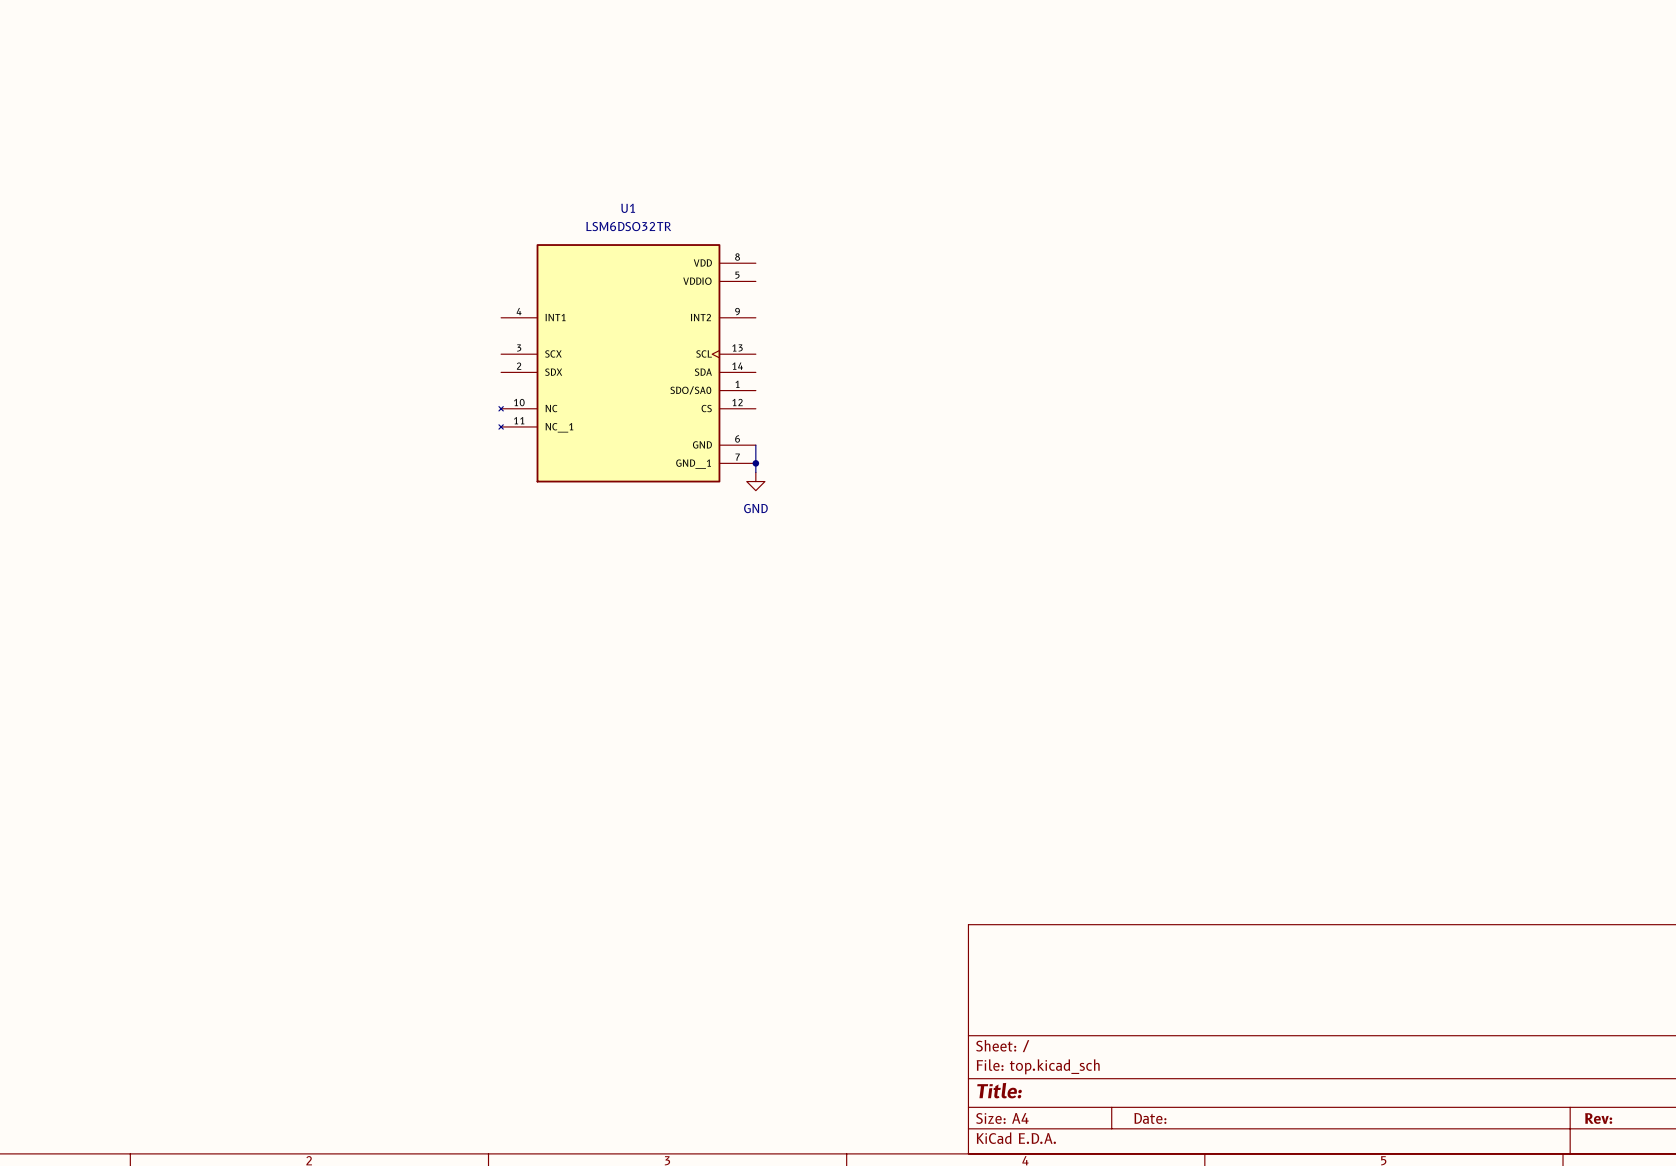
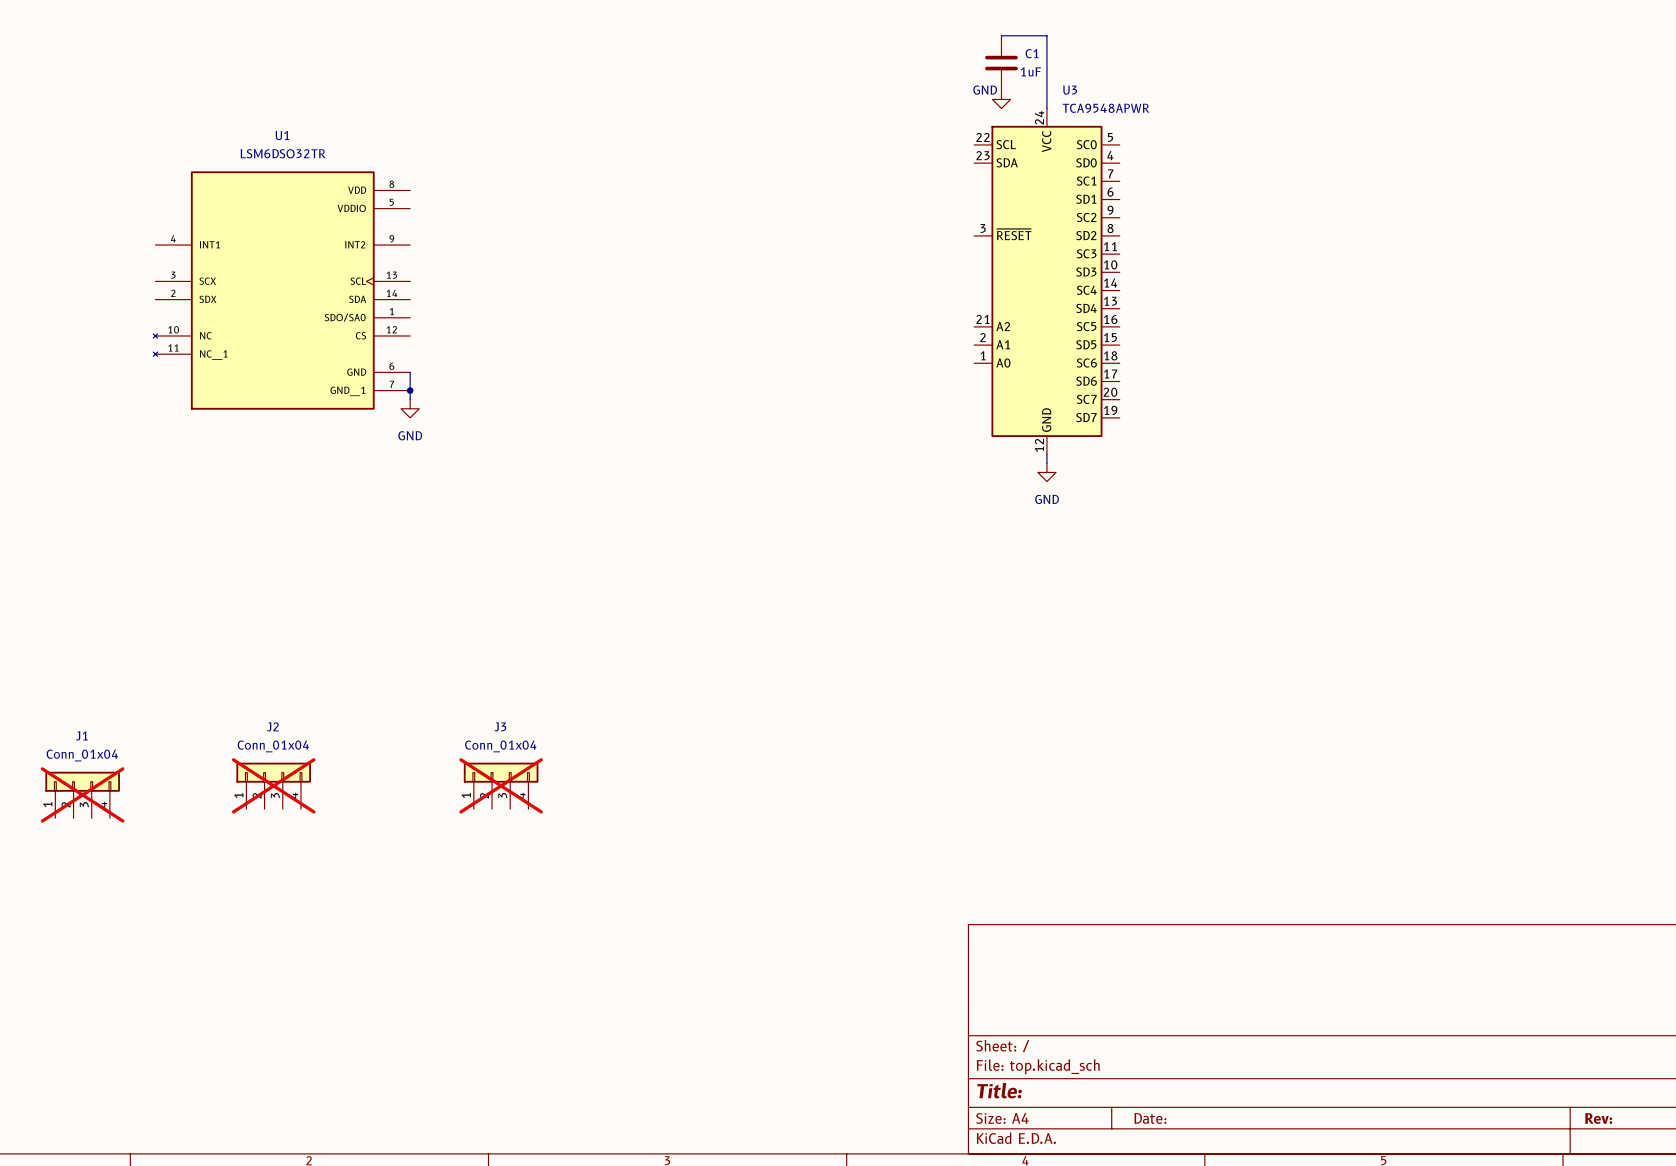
wire: none -> (1001, 35) (1046, 35) (1046, 108)
C1: none -> 1uF (1001, 63)
power symbol: none -> GND (1001, 99)
U3: none -> TCA9548APWR (1046, 281)
U1 position: (627, 363) -> (281, 290)
wire: none -> (410, 372) (410, 399)
junction: none -> (410, 390)
power symbol: none -> GND (410, 408)
wire: (755, 445) (755, 472) -> none
wire: none -> (1046, 454) (1046, 463)
junction: (755, 463) -> none
power symbol: none -> GND (1046, 472)
power symbol: GND (755, 481) -> none
J2: none -> Conn_01x04 (273, 785)
J3: none -> Conn_01x04 (501, 785)
J1: none -> Conn_01x04 (82, 794)

